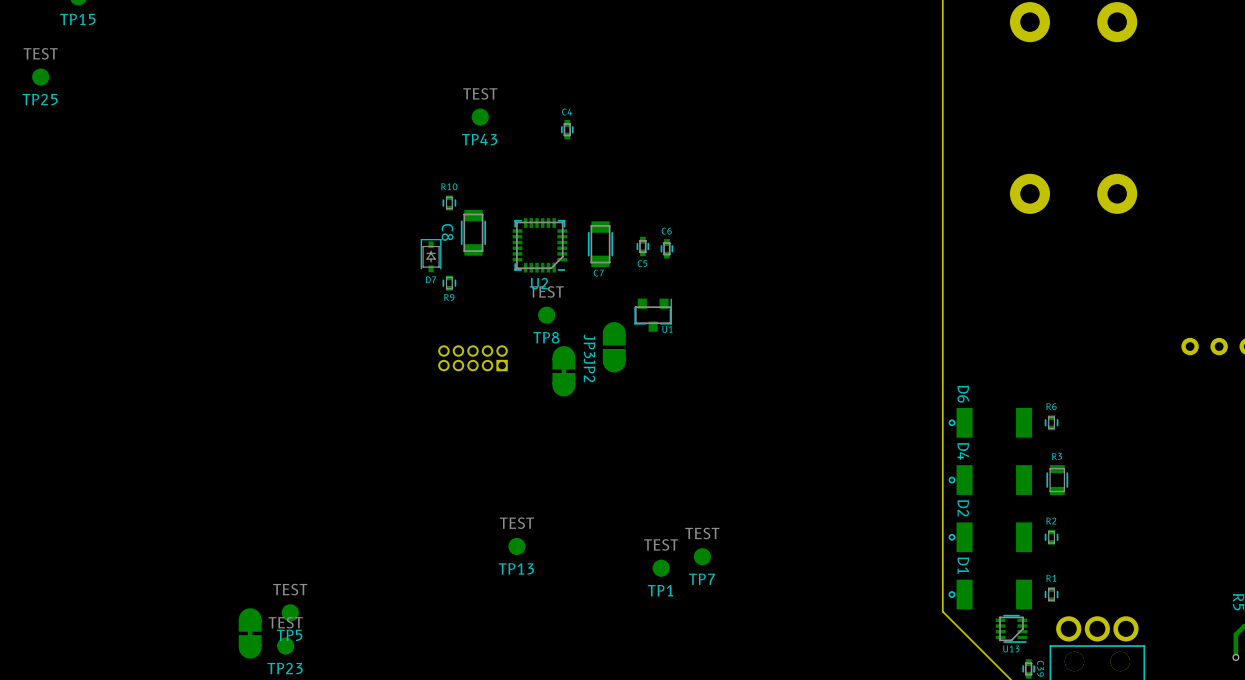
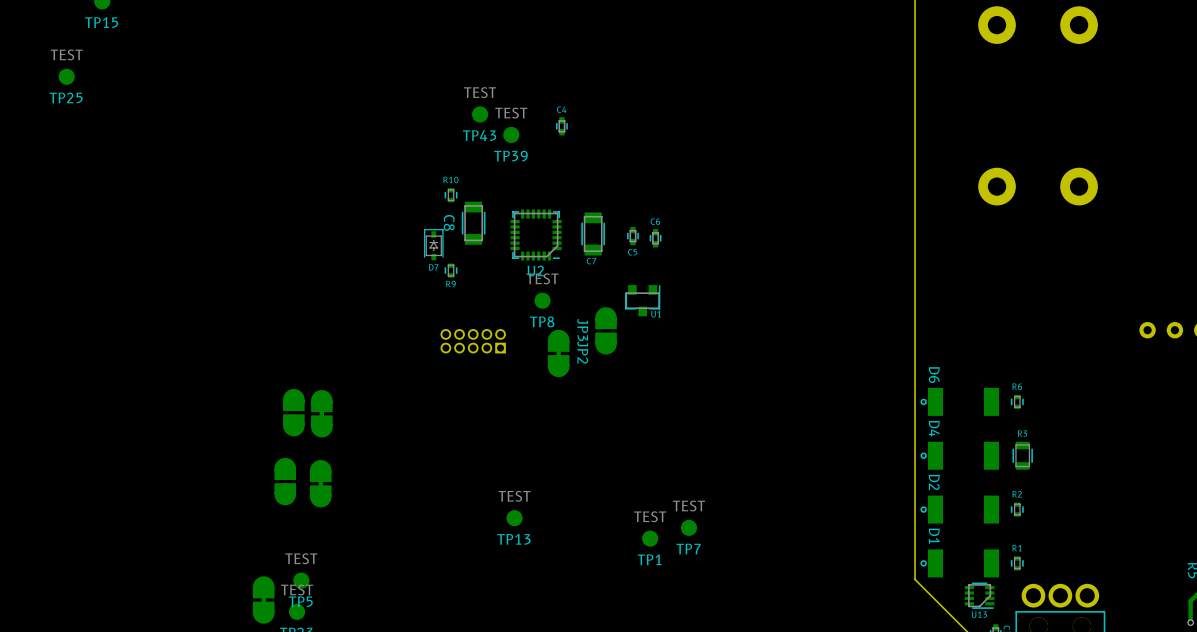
TP39: none -> TEST (511, 134)
part: none -> (293, 412)
part: none -> (321, 413)
part: none -> (285, 481)
part: none -> (320, 483)

